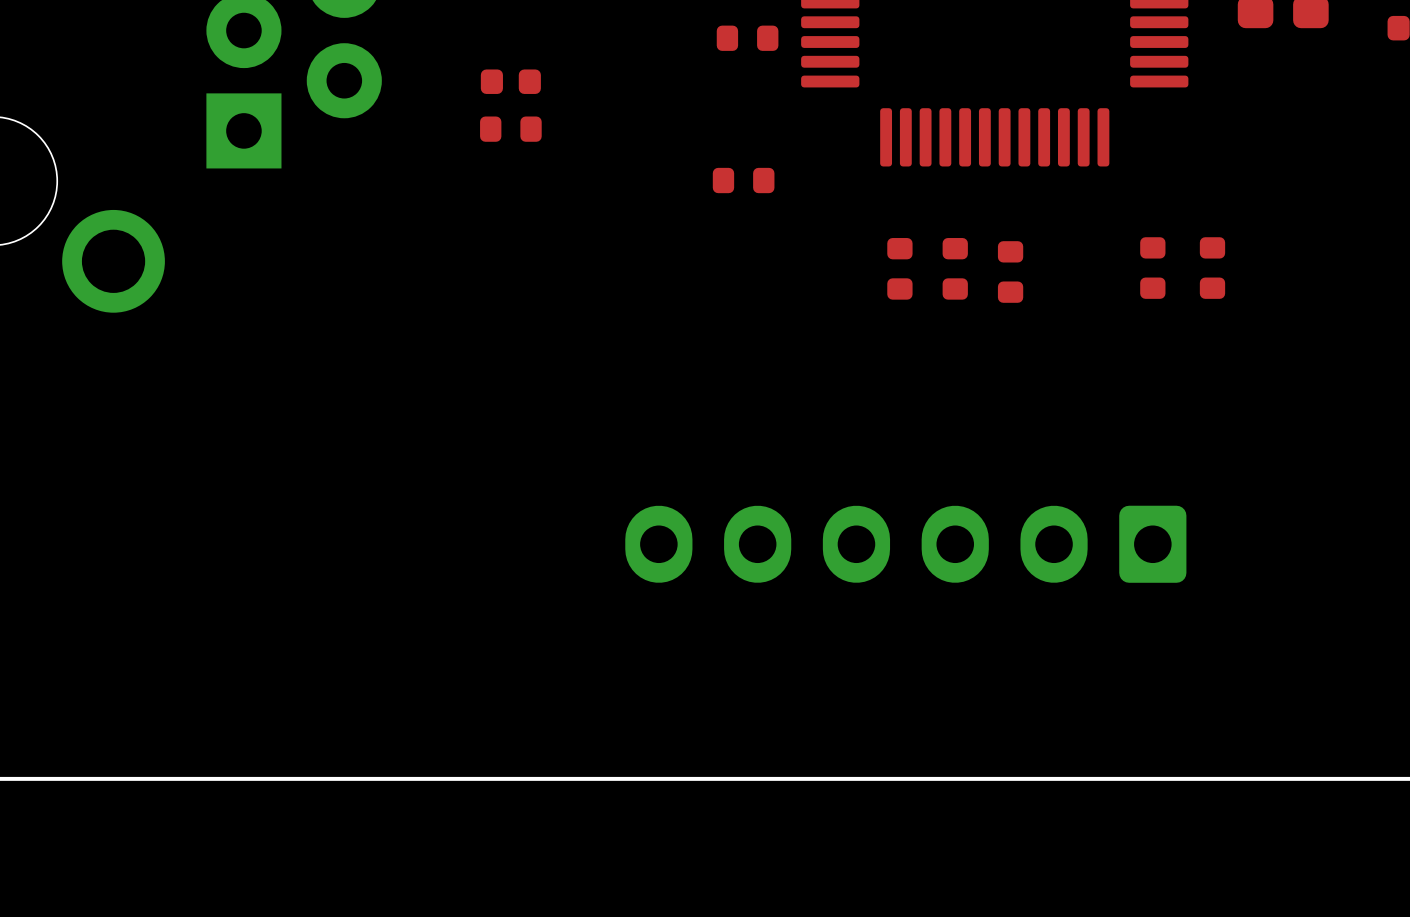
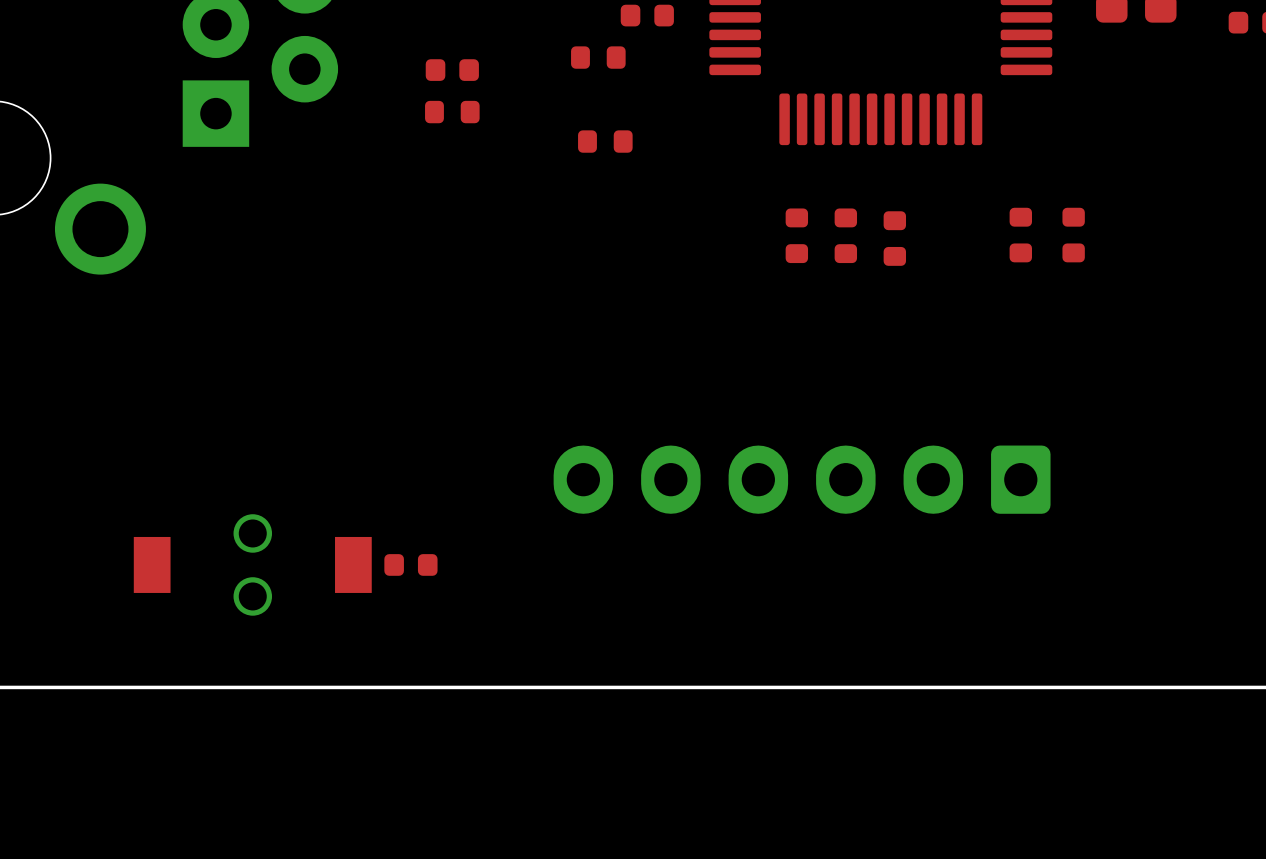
part footprint: [716, 25, 779, 51] -> [620, 4, 674, 27]
part: none -> (598, 57)
part position: (743, 180) -> (605, 141)
part: none -> (252, 564)
part: none -> (410, 564)

